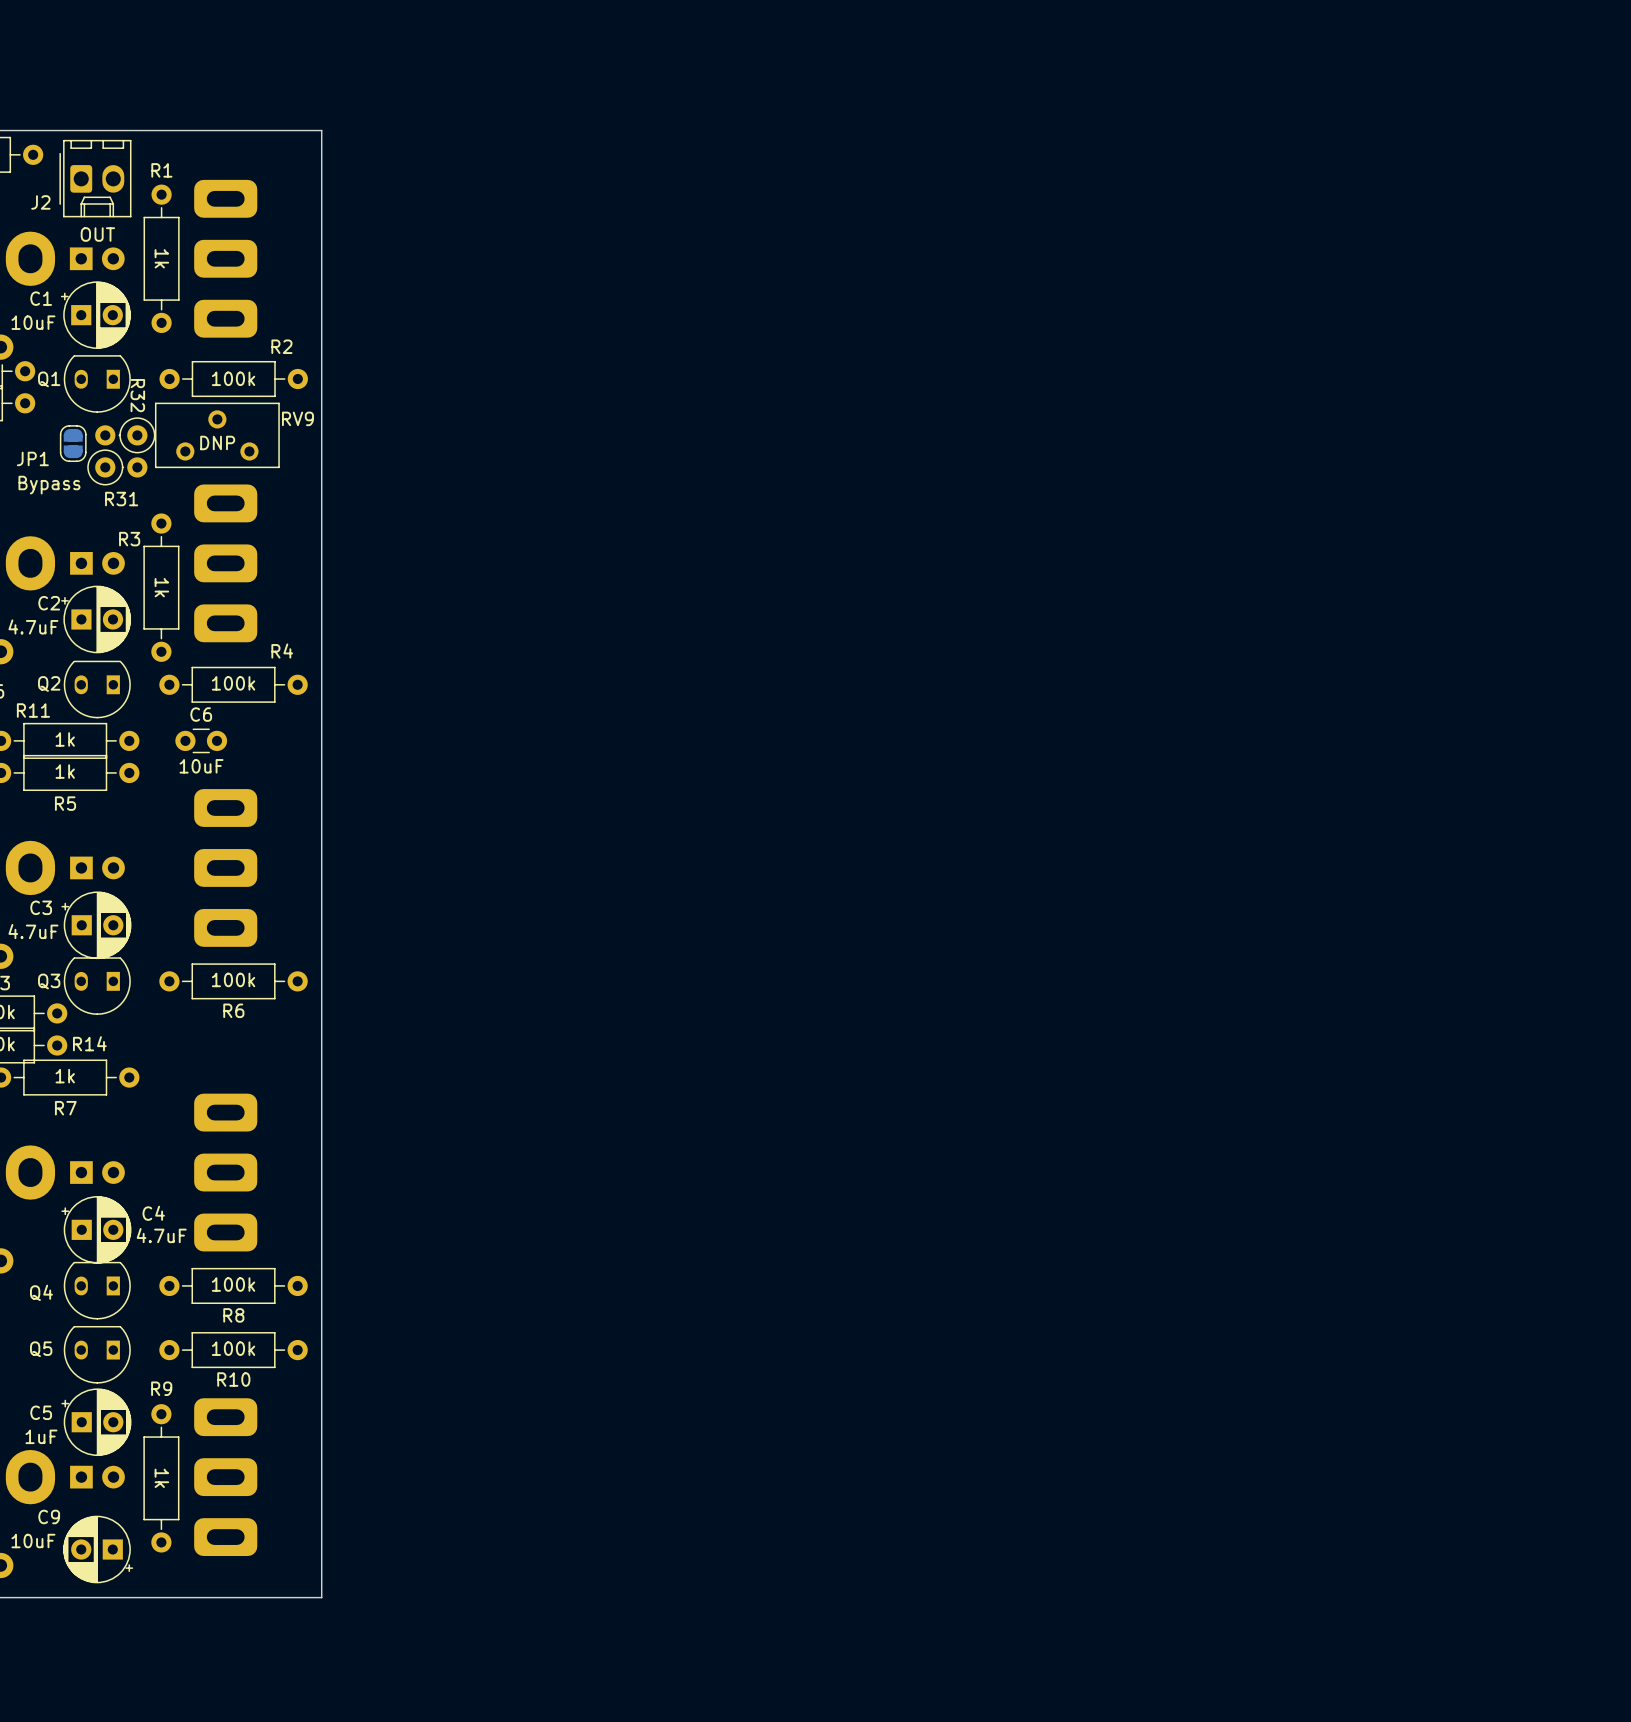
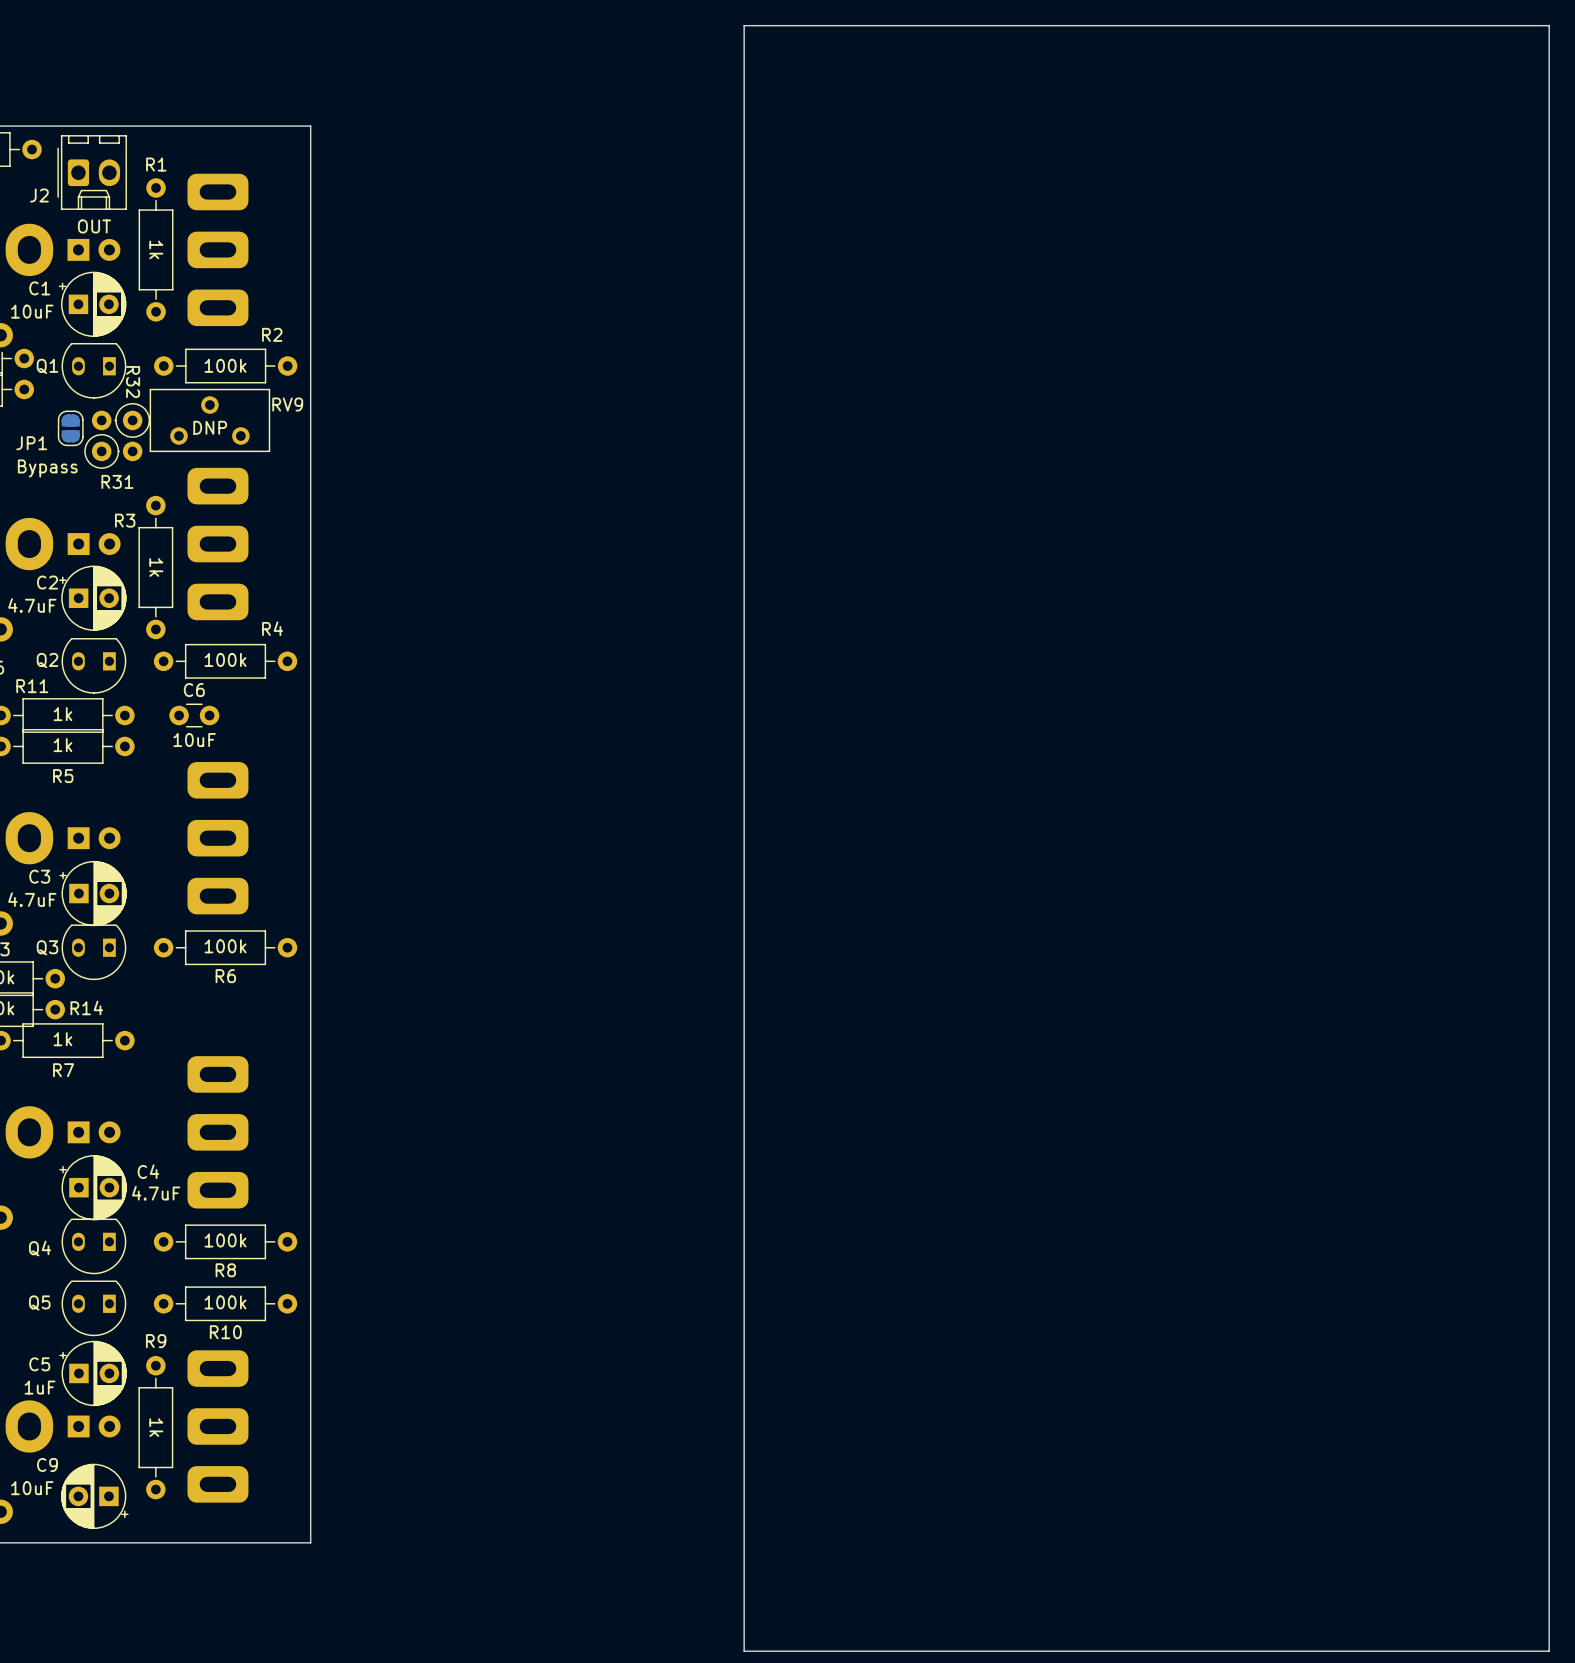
board edge: none -> (1549, 25) (744, 25) (744, 1651) (1549, 1651) (1549, 25)

